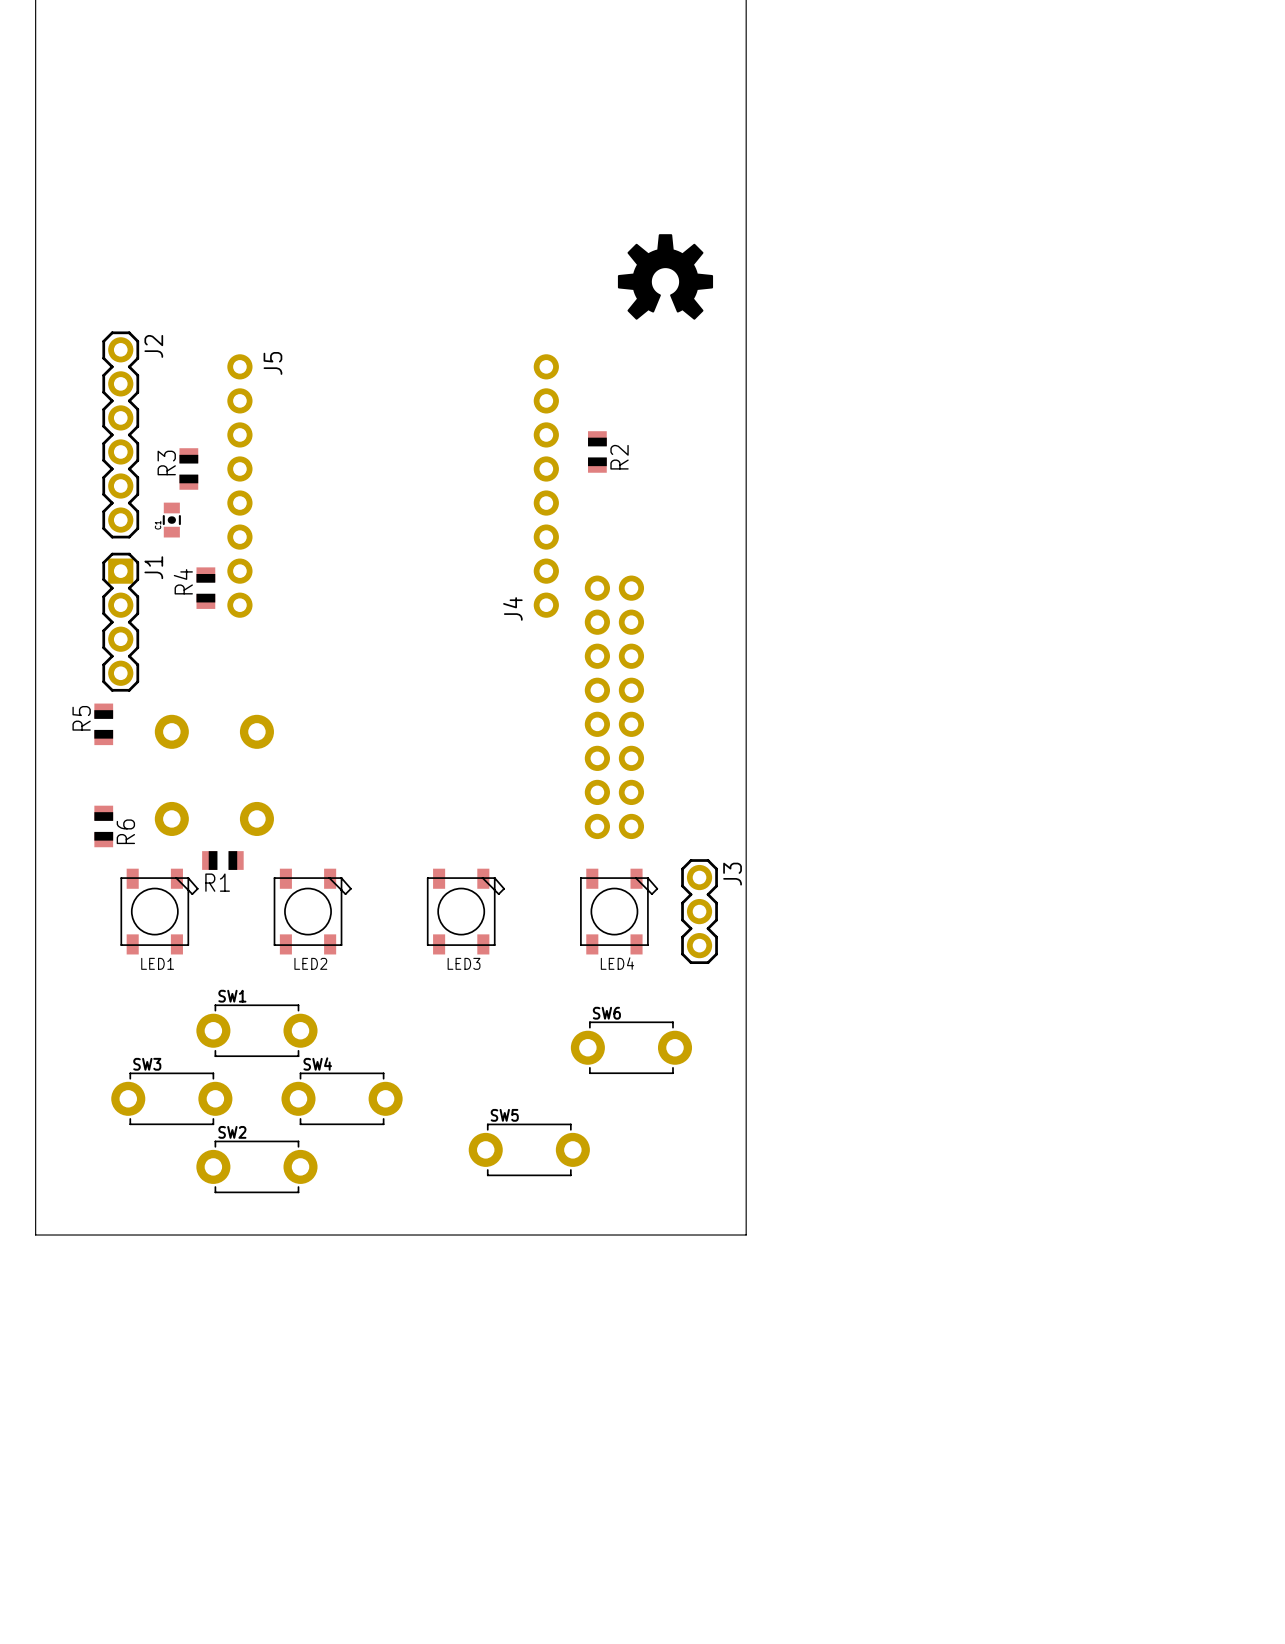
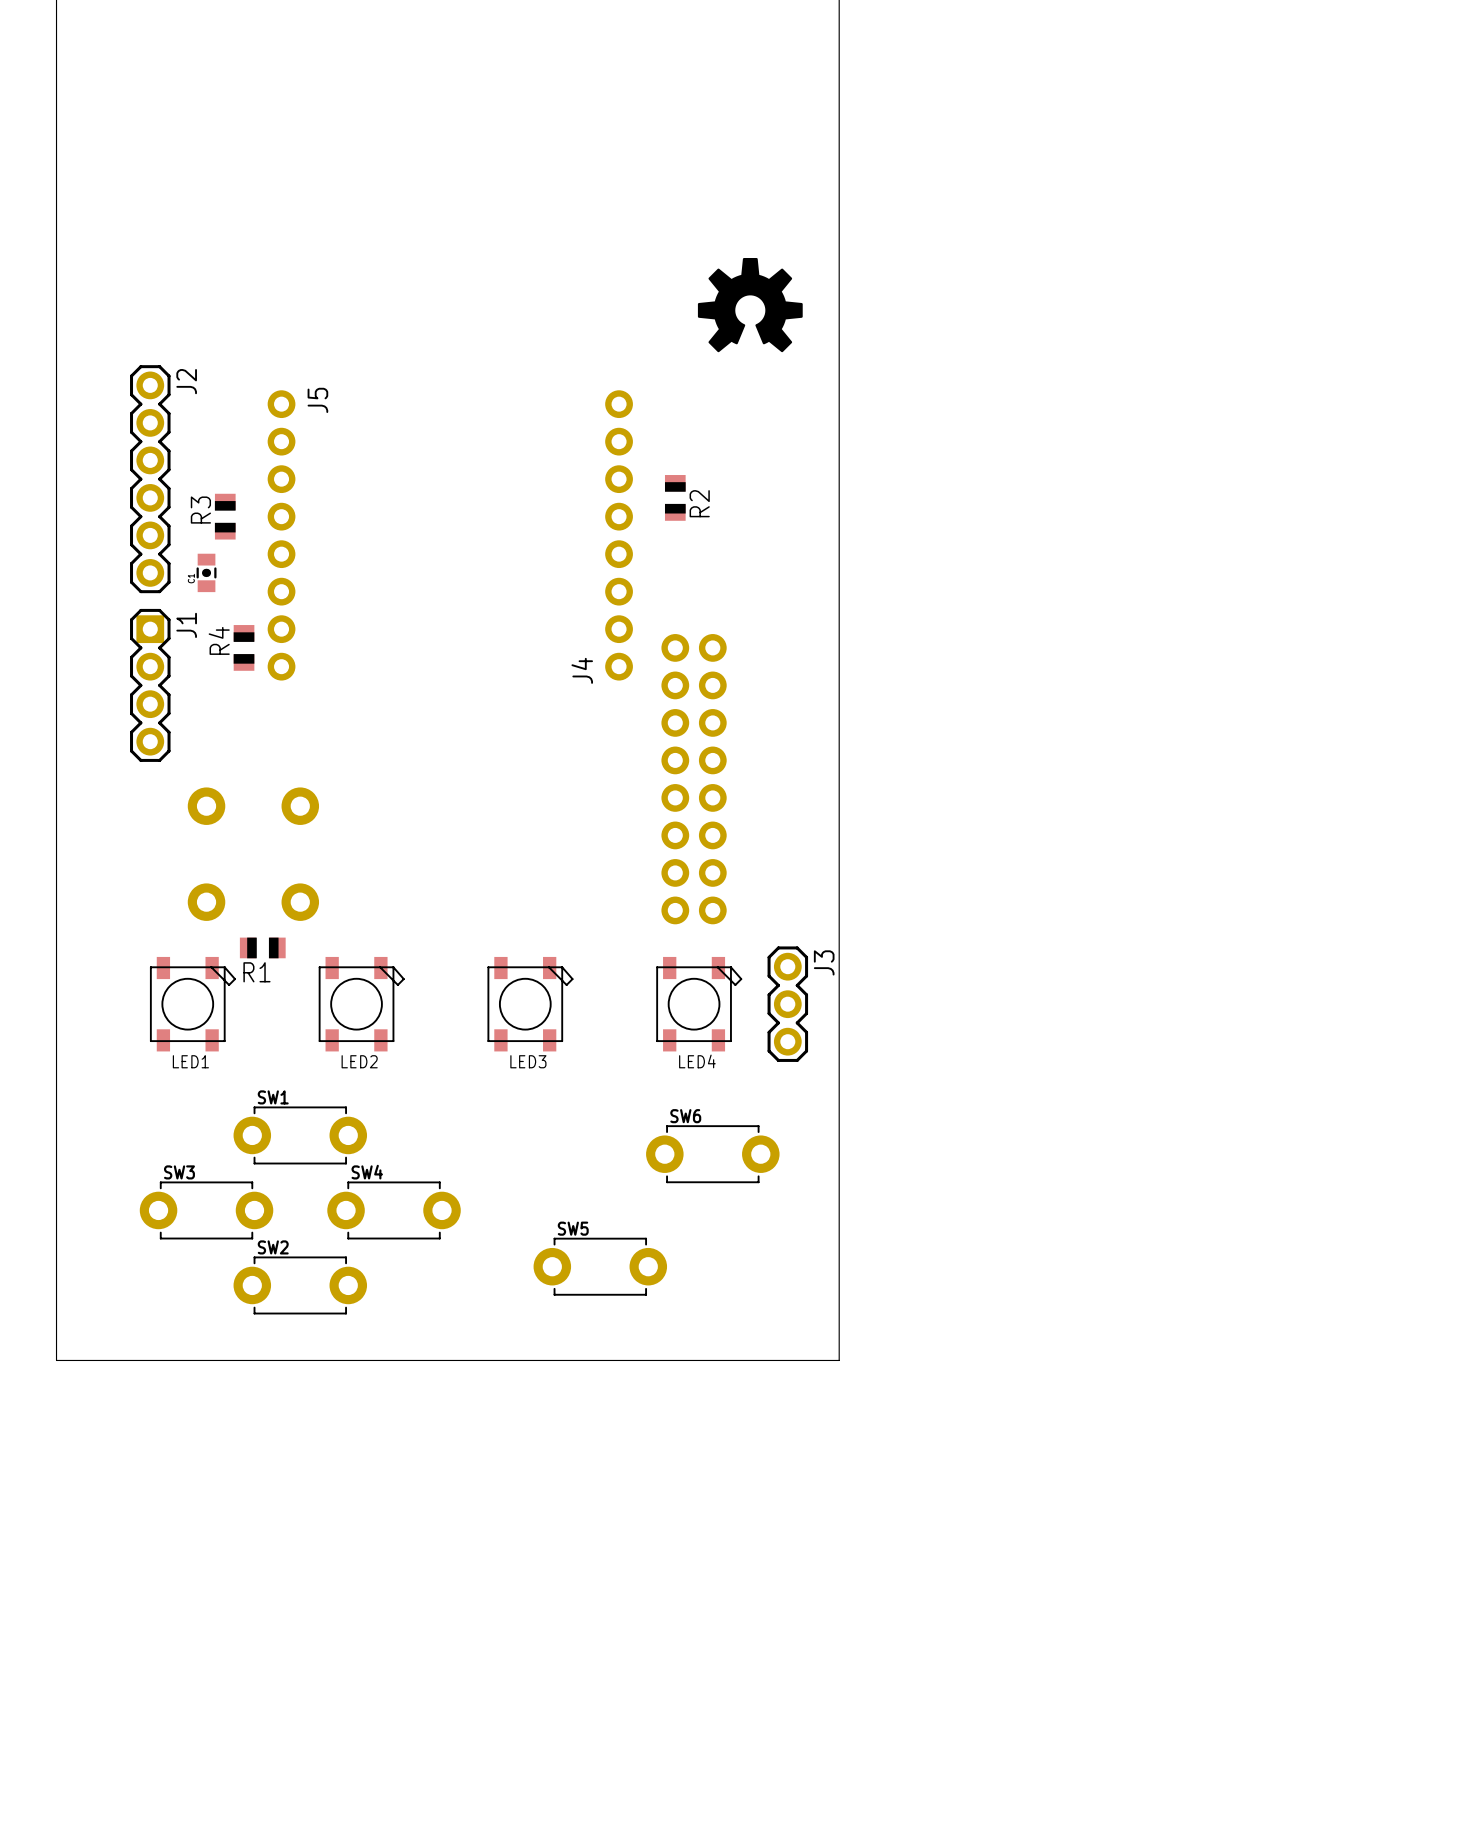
R5: (103, 724) -> none
R6: (103, 826) -> none

